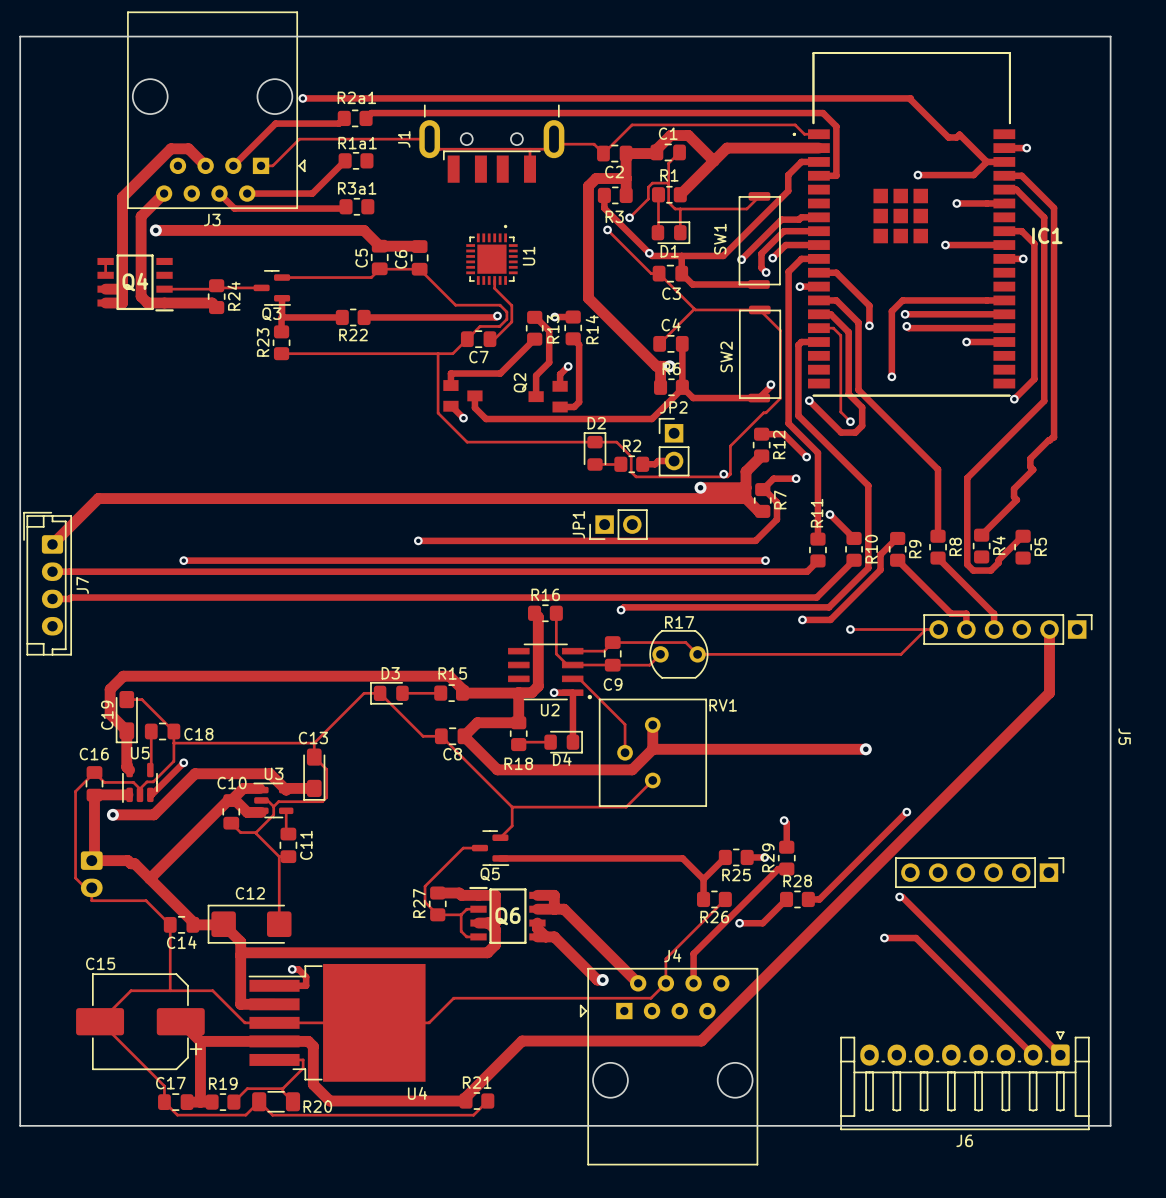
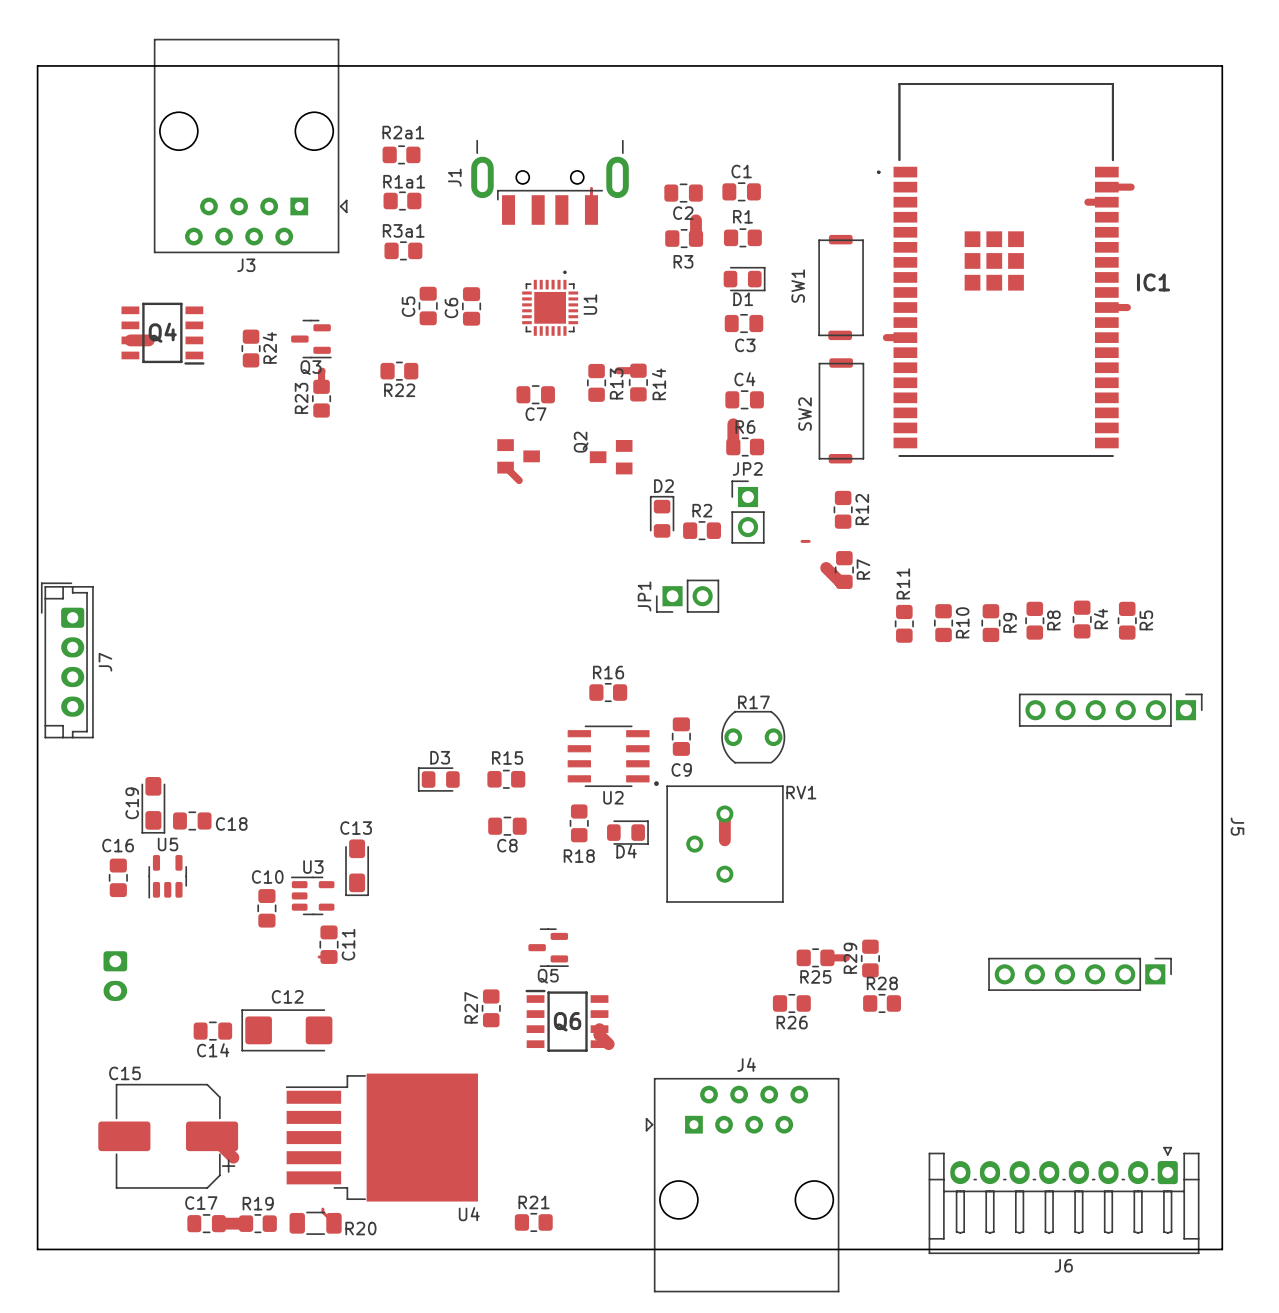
track: (302, 98) (910, 98) (948, 137) (956, 137) (959, 134) (986, 161) (973, 175) (917, 175) -> none
via: (302, 98) -> none
track: (344, 118) (339, 123) (275, 123) (233, 165) -> none
track: (366, 118) (371, 113) (823, 113) (836, 126) (836, 175) (818, 175) -> none
track: (818, 134) (804, 134) (795, 124) (632, 124) (603, 153) (594, 144) (554, 144) -> none
track: (554, 144) (548, 149) (439, 149) (429, 139) (299, 139) (272, 165) (261, 165) -> none
track: (818, 148) (726, 148) (680, 194) -> none
via: (1026, 148) -> none
track: (679, 152) (668, 163) (668, 202) (675, 209) (746, 209) (759, 196) -> none
track: (345, 160) (312, 193) (247, 193) -> none
track: (713, 161) (688, 135) (670, 135) (656, 149) (655, 153) (626, 153) (626, 178) (596, 178) (588, 186) (588, 298) (656, 366) (669, 366) -> none
track: (818, 161) (801, 161) (788, 175) (788, 191) (723, 255) (652, 255) (604, 208) (604, 195) -> none
track: (205, 165) (188, 148) (170, 148) (122, 197) (122, 303) (105, 303) -> none
via: (917, 175) -> none
track: (1004, 175) (1021, 175) (1054, 208) (1054, 437) (1030, 458) (1030, 466) (1033, 469) (1014, 488) (1014, 497) (1016, 499) (981, 535) -> none
track: (668, 183) (652, 183) (648, 187) (648, 198) (629, 217) -> none
track: (1004, 189) (1016, 189) (1044, 217) (1044, 401) (967, 478) (967, 564) (973, 570) (990, 570) (1023, 536) -> none
track: (164, 193) (141, 216) (141, 296) (147, 303) (212, 303) (216, 307) -> none
track: (219, 193) (234, 208) (344, 208) (346, 206) -> none
track: (658, 194) (657, 232) -> none
track: (956, 203) (1004, 203) -> none
via: (956, 203) -> none
track: (680, 209) (680, 232) -> none
via: (629, 217) -> none
track: (818, 217) (781, 219) (741, 259) -> none
track: (607, 229) (651, 273) (659, 273) (695, 309) (759, 309) (780, 330) (780, 398) (730, 446) (730, 474) (727, 476) (636, 476) (631, 472) (631, 456) (616, 442) (467, 442) (438, 413) (438, 353) -> none
via: (607, 229) -> none
track: (155, 230) (363, 230) (379, 246) (419, 246) -> none
via: (155, 230) -> none
track: (818, 231) (783, 231) (761, 253) (761, 267) (766, 272) -> none
track: (1004, 231) (1021, 231) (1034, 243) (1034, 379) (1014, 399) -> none
track: (818, 245) (785, 245) (772, 258) -> none
track: (945, 245) (1004, 245) -> none
via: (945, 245) -> none
via: (649, 253) -> none
track: (681, 255) (681, 273) (692, 284) (758, 284) -> none
via: (772, 258) -> none
track: (818, 258) (801, 258) (788, 271) (788, 423) (817, 452) (817, 539) -> none
via: (1023, 258) -> none
via: (741, 259) -> none
track: (105, 261) (105, 275) -> none
track: (379, 269) (371, 277) (282, 277) -> none
track: (379, 269) (419, 269) (455, 305) (500, 305) (506, 312) (506, 319) (499, 326) (480, 326) (452, 353) (281, 353) -> none
via: (766, 272) -> none
track: (818, 272) (836, 272) (869, 305) (869, 325) -> none
track: (494, 280) (494, 288) (511, 305) (511, 321) (494, 339) (489, 339) -> none
via: (799, 286) -> none
track: (261, 287) (218, 287) (216, 285) (213, 289) (164, 289) -> none
track: (282, 298) (282, 317) (342, 317) -> none
track: (818, 300) (836, 300) (858, 322) (858, 389) (938, 469) (938, 536) -> none
track: (1004, 300) (902, 300) (891, 311) (891, 376) -> none
track: (694, 309) (659, 343) -> none
track: (818, 314) (830, 314) (848, 332) (848, 394) (862, 407) (862, 425) (855, 432) (841, 432) (809, 400) -> none
track: (905, 314) (1004, 314) -> none
via: (905, 314) -> none
track: (497, 315) (495, 317) (364, 317) -> none
via: (497, 315) -> none
track: (534, 317) (549, 330) (549, 362) (536, 375) (536, 396) -> none
via: (554, 317) -> none
via: (869, 325) -> none
track: (906, 326) (908, 328) (1004, 328) -> none
via: (906, 326) -> none
track: (818, 328) (833, 328) (840, 335) (840, 412) (850, 421) -> none
track: (573, 338) (579, 344) (579, 402) (574, 407) (560, 407) -> none
track: (534, 339) (500, 373) (450, 373) (450, 385) -> none
track: (818, 342) (801, 342) (798, 345) (798, 415) (868, 485) (868, 568) (829, 607) (623, 607) (621, 610) -> none
track: (966, 342) (1004, 342) -> none
via: (966, 342) -> none
track: (682, 343) (682, 387) (693, 398) (759, 398) (770, 384) -> none
track: (568, 366) (560, 374) (560, 386) -> none
via: (568, 366) -> none
via: (669, 366) -> none
via: (891, 376) -> none
via: (770, 384) -> none
track: (683, 387) (651, 419) (486, 419) (474, 407) (474, 395) -> none
via: (1014, 399) -> none
via: (809, 400) -> none
via: (463, 418) -> none
via: (850, 421) -> none
track: (761, 434) (783, 434) (806, 457) -> none
track: (761, 455) (746, 471) (746, 498) (98, 498) (52, 544) -> none
via: (806, 457) -> none
track: (674, 461) (658, 461) (654, 464) (642, 464) -> none
track: (620, 464) (595, 464) -> none
via: (723, 474) -> none
track: (796, 478) (773, 478) (762, 489) (776, 502) (776, 519) (755, 540) (418, 540) -> none
via: (796, 478) -> none
track: (700, 487) (746, 487) -> none
via: (700, 487) -> none
via: (829, 514) -> none
track: (830, 514) (854, 538) -> none
track: (897, 538) (880, 554) (880, 569) (830, 619) (802, 619) -> none
via: (418, 540) -> none
track: (938, 558) (994, 613) (994, 629) -> none
track: (183, 560) (765, 560) -> none
via: (183, 560) -> none
via: (765, 560) -> none
track: (817, 560) (807, 571) (52, 571) -> none
track: (854, 560) (816, 597) (52, 598) -> none
track: (897, 560) (951, 613) (966, 613) (966, 629) -> none
via: (621, 610) -> none
track: (534, 613) (538, 617) (538, 686) (531, 692) (518, 692) -> none
track: (556, 613) (556, 653) (567, 665) (649, 665) (660, 654) -> none
via: (802, 619) -> none
track: (850, 629) (938, 629) -> none
via: (850, 629) -> none
track: (925, 629) (901, 654) (697, 654) (685, 642) (612, 642) (604, 651) (572, 651) -> none
track: (1049, 629) (1049, 692) (701, 1041) (522, 1041) (465, 1097) (465, 1101) (329, 1101) (313, 1084) (313, 1046) (308, 1041) (200, 1041) (200, 1102) -> none
track: (572, 678) (579, 678) (625, 724) (625, 752) -> none
track: (518, 692) (518, 722) (477, 722) (463, 736) (497, 769) (632, 769) (652, 749) (865, 749) -> none
track: (554, 692) (572, 692) (572, 742) -> none
via: (554, 692) -> none
track: (440, 693) (402, 693) -> none
track: (518, 693) (462, 693) (462, 689) (449, 676) (123, 676) (110, 689) (110, 714) (126, 730) (126, 767) (129, 770) -> none
track: (126, 699) (142, 699) (173, 731) (173, 761) (153, 781) (146, 781) (139, 788) -> none
track: (151, 731) (150, 770) -> none
track: (550, 742) (521, 742) (518, 744) -> none
track: (173, 743) (314, 743) -> none
track: (314, 743) (314, 757) (326, 769) (326, 797) (322, 801) (278, 801) (273, 806) -> none
track: (314, 743) (364, 693) (380, 693) (423, 736) (441, 736) (512, 807) -> none
via: (865, 749) -> none
track: (183, 762) (150, 794) -> none
via: (183, 762) -> none
track: (652, 780) (626, 807) (512, 807) -> none
track: (139, 788) (133, 782) (104, 782) (94, 772) (75, 791) (75, 878) (91, 894) -> none
track: (314, 788) (287, 788) (286, 790) (269, 773) (195, 773) (153, 814) (112, 814) -> none
track: (261, 790) (243, 788) (231, 800) -> none
track: (129, 794) (94, 795) (94, 857) (91, 860) (127, 860) (131, 863) (134, 863) (149, 878) -> none
track: (261, 800) (267, 800) (273, 806) -> none
track: (273, 806) (273, 814) (256, 832) -> none
track: (512, 807) (512, 825) (500, 837) -> none
track: (261, 810) (261, 812) (247, 812) (235, 800) (228, 800) (149, 878) -> none
track: (286, 810) (286, 831) (288, 834) -> none
track: (906, 812) (819, 899) (808, 899) -> none
via: (906, 812) -> none
via: (112, 814) -> none
track: (784, 820) (786, 823) (786, 847) -> none
via: (784, 820) -> none
track: (231, 823) (240, 832) (256, 832) -> none
track: (256, 832) (279, 856) (279, 924) -> none
track: (479, 848) (463, 848) (425, 886) (425, 902) (437, 914) (461, 914) -> none
track: (725, 857) (703, 879) -> none
via: (764, 857) -> none
track: (500, 858) (682, 858) (703, 879) -> none
track: (786, 869) (778, 869) (693, 953) (693, 983) -> none
track: (149, 878) (192, 921) (192, 924) (223, 924) -> none
track: (703, 879) (703, 899) -> none
track: (91, 887) (91, 900) (146, 900) (170, 924) (170, 990) -> none
track: (437, 893) (495, 895) (495, 923) (478, 923) -> none
track: (537, 895) (554, 895) (554, 909) -> none
track: (899, 896) (902, 896) (1060, 1055) -> none
via: (899, 896) -> none
track: (725, 899) (665, 958) (665, 983) (650, 998) (453, 998) (429, 1022) (244, 1022) (212, 990) (131, 990) (100, 1021) (164, 1086) (164, 1102) (177, 1115) (245, 1115) (259, 1101) (272, 1115) (473, 1115) (487, 1101) -> none
track: (786, 899) (762, 923) (739, 923) -> none
track: (478, 909) (466, 909) (461, 914) -> none
track: (537, 909) (564, 909) (638, 983) -> none
track: (461, 914) (461, 931) (466, 936) (478, 936) -> none
track: (488, 923) (495, 929) (495, 944) (487, 952) (243, 952) (240, 955) -> none
via: (739, 923) -> none
track: (223, 924) (240, 941) (240, 1004) (274, 1004) -> none
track: (537, 936) (554, 936) (597, 980) (602, 980) -> none
track: (884, 938) (916, 938) (1033, 1055) -> none
via: (884, 938) -> none
track: (292, 969) (298, 969) (306, 977) (306, 985) (274, 985) -> none
via: (292, 969) -> none
via: (602, 980) -> none
track: (274, 1059) (303, 1059) (303, 1068) (282, 1088) (247, 1088) (233, 1102) -> none

